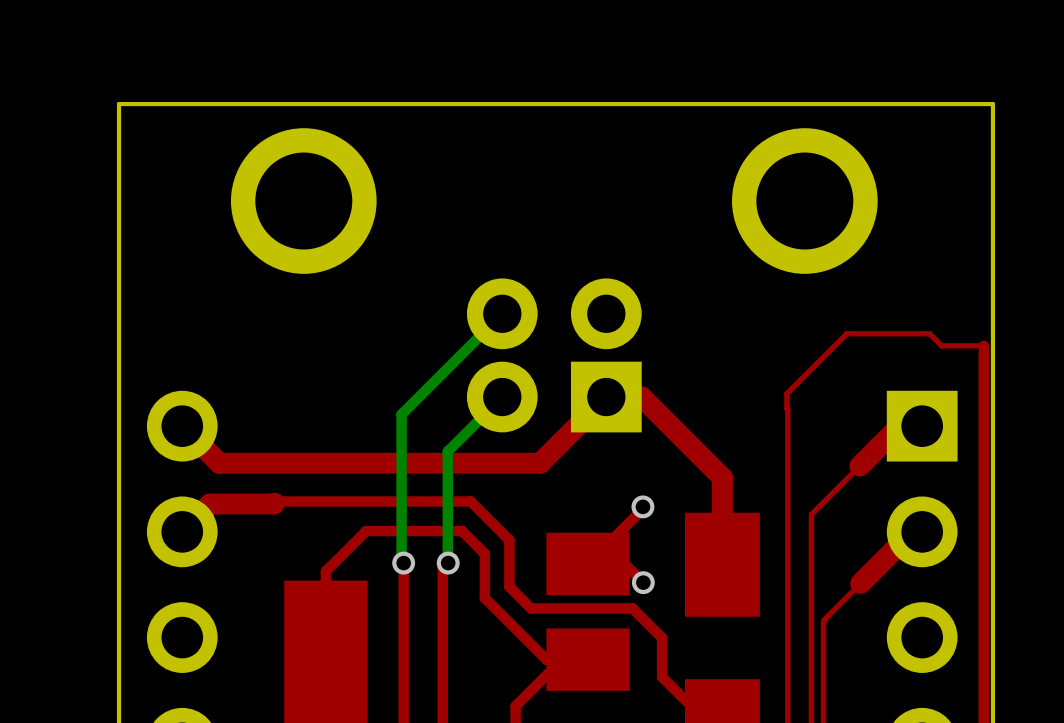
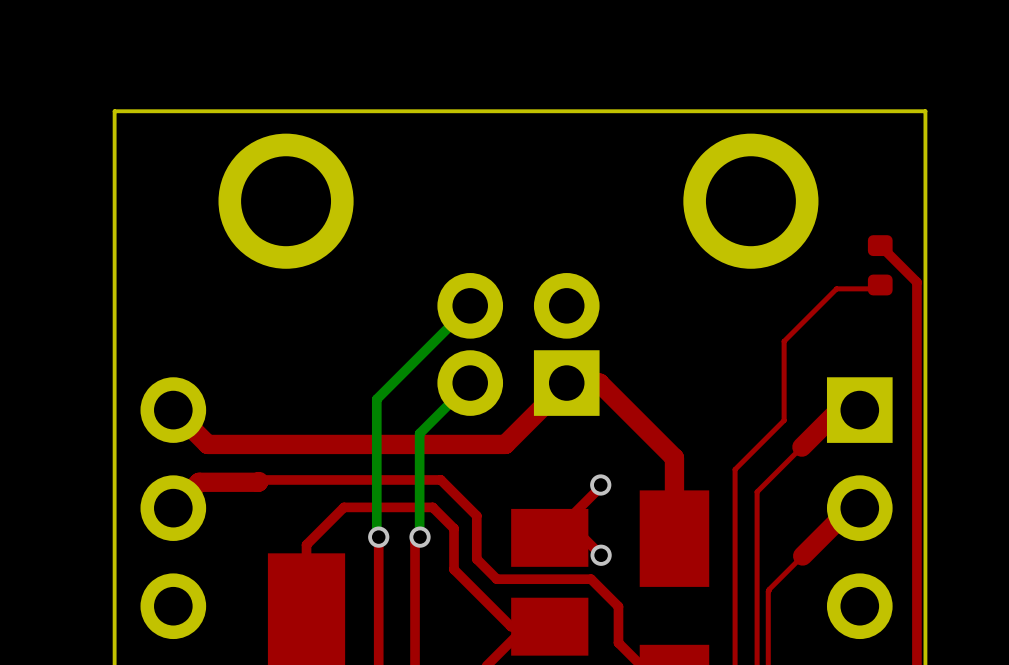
top track: none -> (880, 245) (916, 282) (916, 335)
part: none -> (880, 265)
top track: (983, 345) (941, 345) (929, 333) (846, 333) (786, 393) (787, 490) -> (880, 284) (876, 288) (836, 288) (784, 341) (784, 420) (735, 469)

